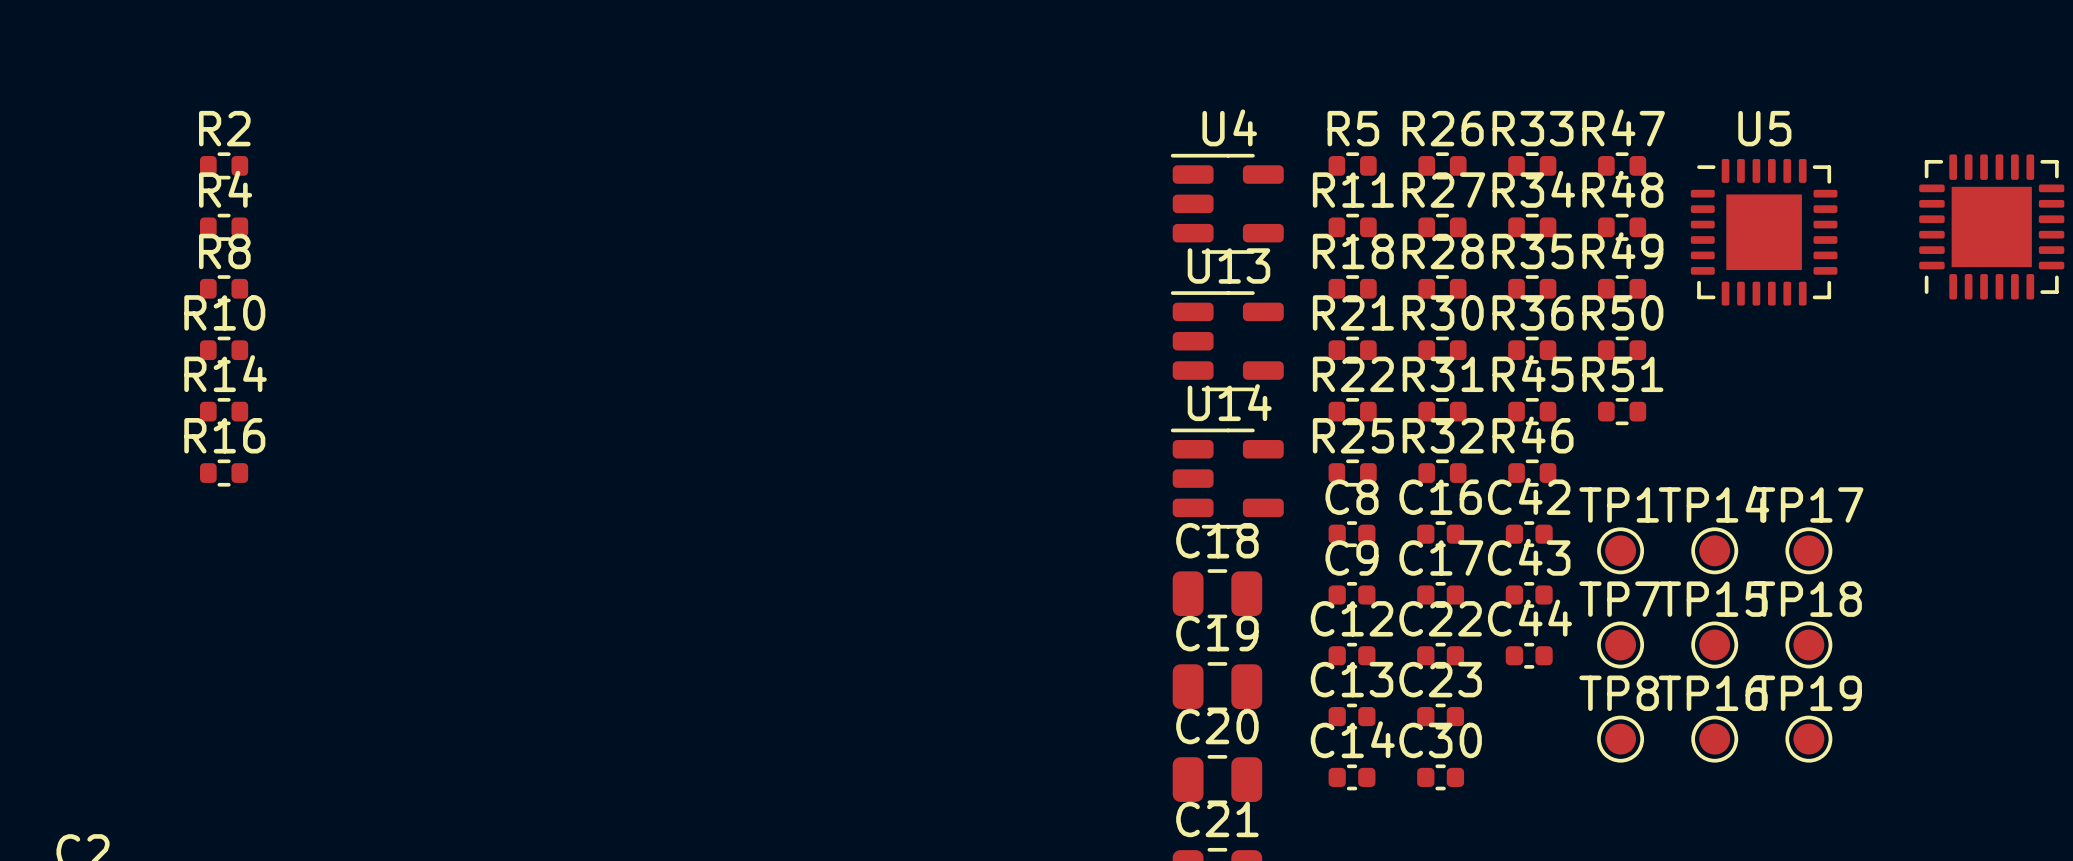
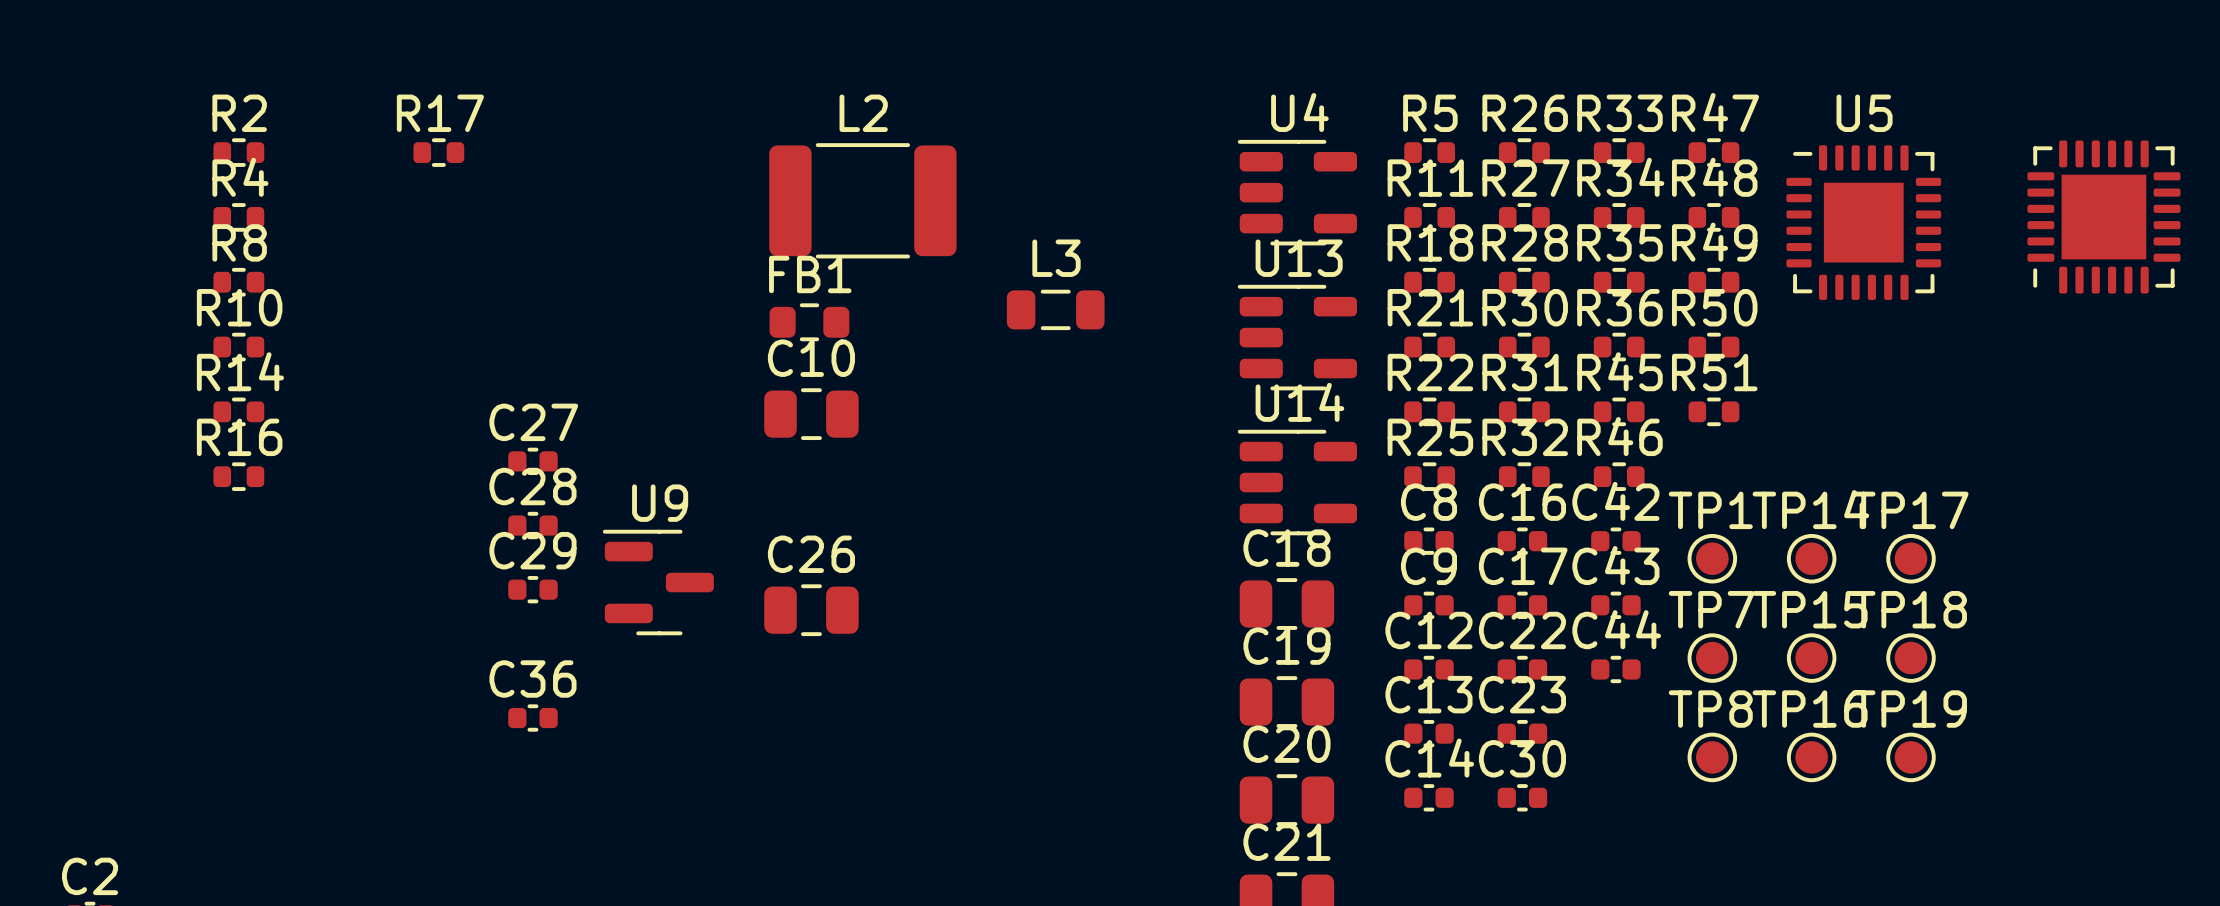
R17: none -> (438, 152)
L2: none -> (862, 200)
L3: none -> (1055, 309)
FB1: none -> (809, 322)
C10: none -> (811, 414)
C27: none -> (532, 461)
C28: none -> (532, 525)
U9: none -> (658, 582)
C29: none -> (532, 589)
C26: none -> (811, 610)
C36: none -> (532, 718)

